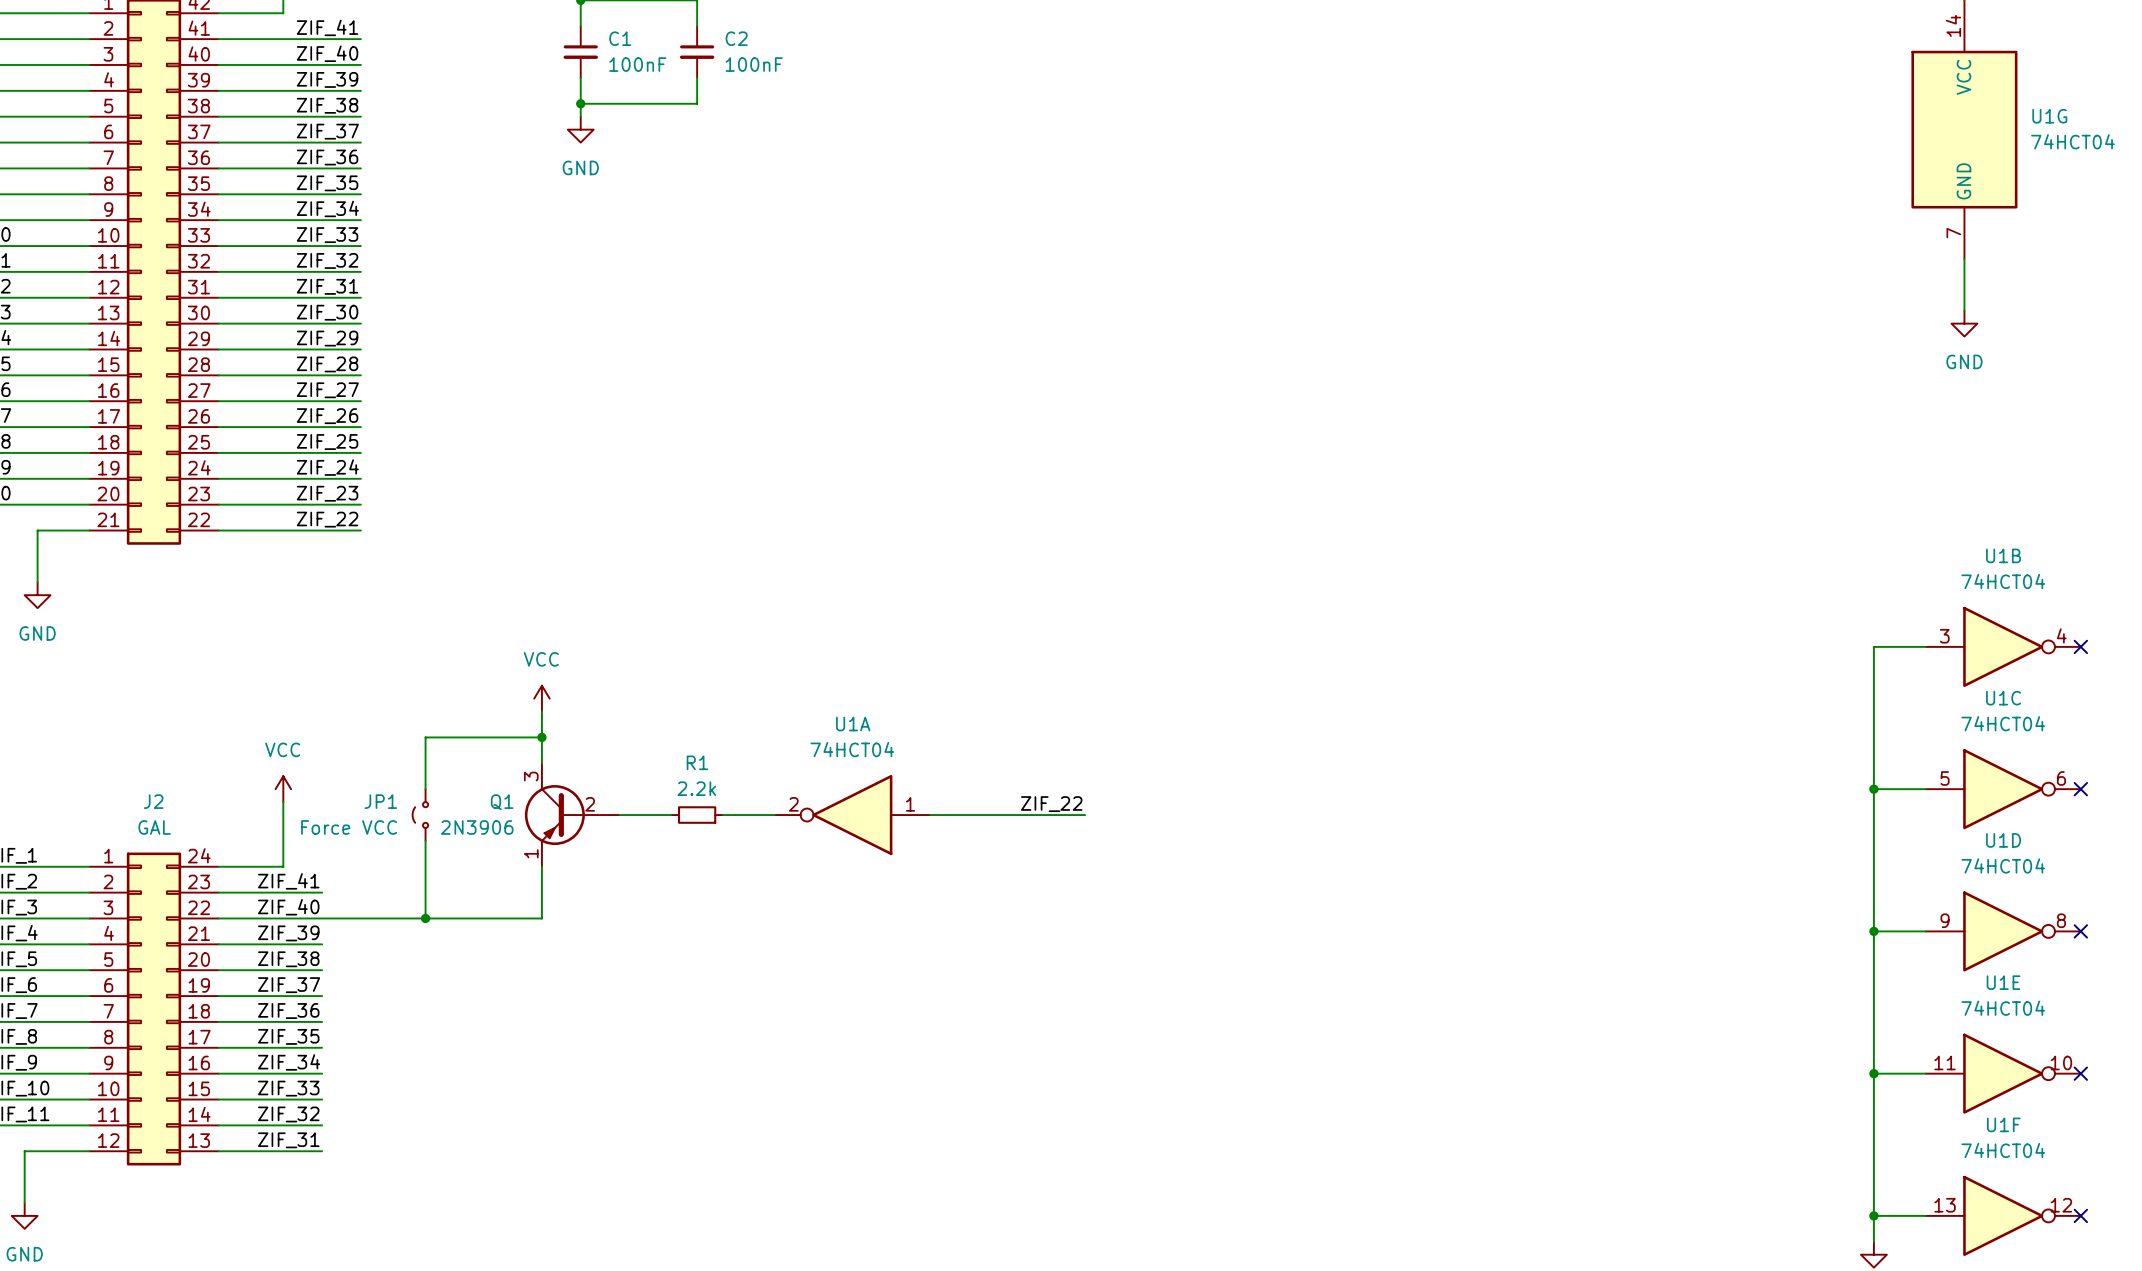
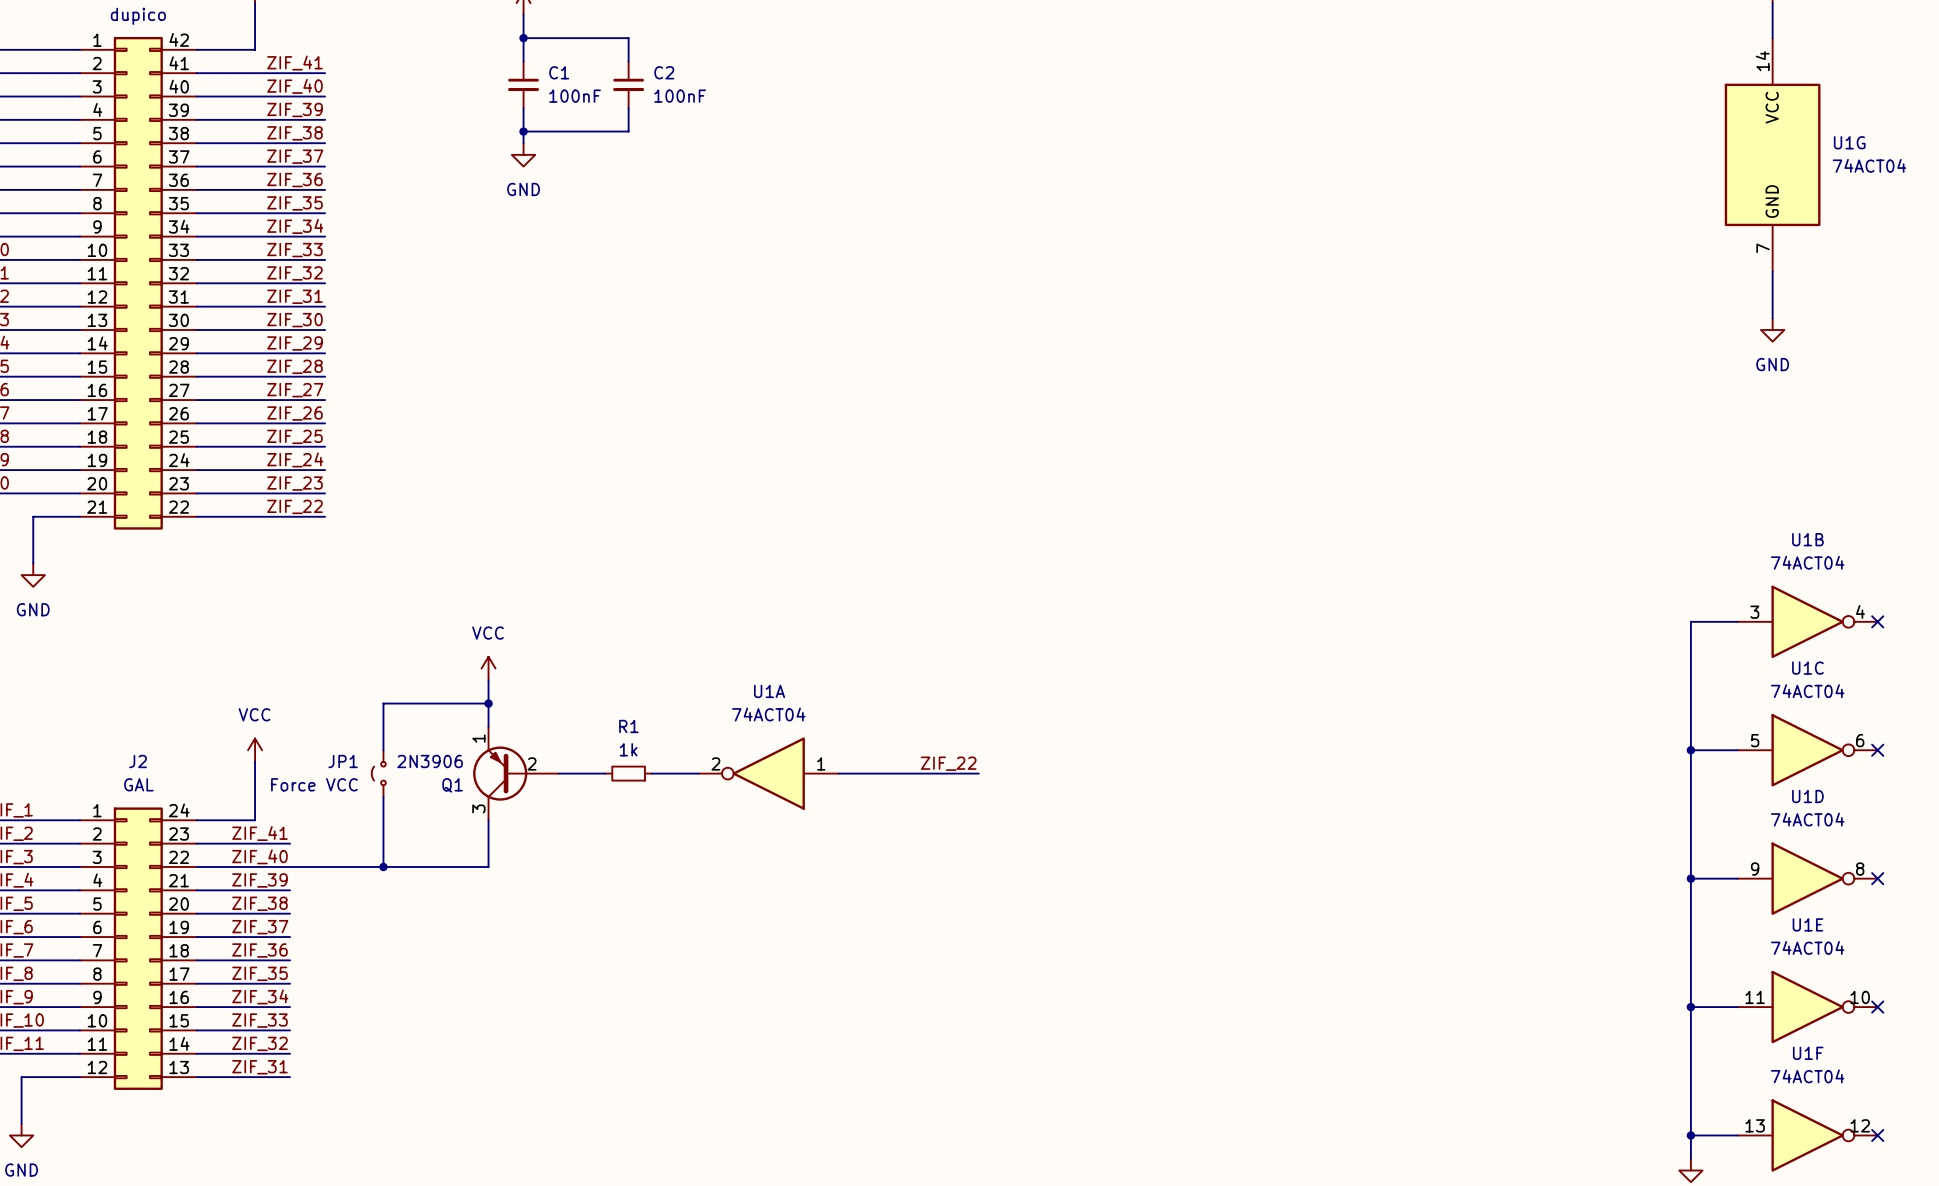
U1G value: 74HCT04 (2072, 141) -> 74ACT04 (1869, 165)
U1B value: 74HCT04 (2003, 581) -> 74ACT04 (1807, 562)
U1C value: 74HCT04 (2003, 723) -> 74ACT04 (1807, 691)
U1A value: 74HCT04 (852, 749) -> 74ACT04 (768, 714)
R1 value: 2.2k (696, 788) -> 1k (628, 749)
Q1 flip: as is (554, 815) -> up-down (500, 773)
U1D value: 74HCT04 (2003, 865) -> 74ACT04 (1807, 819)
U1E value: 74HCT04 (2003, 1008) -> 74ACT04 (1807, 947)
U1F value: 74HCT04 (2003, 1150) -> 74ACT04 (1807, 1076)

